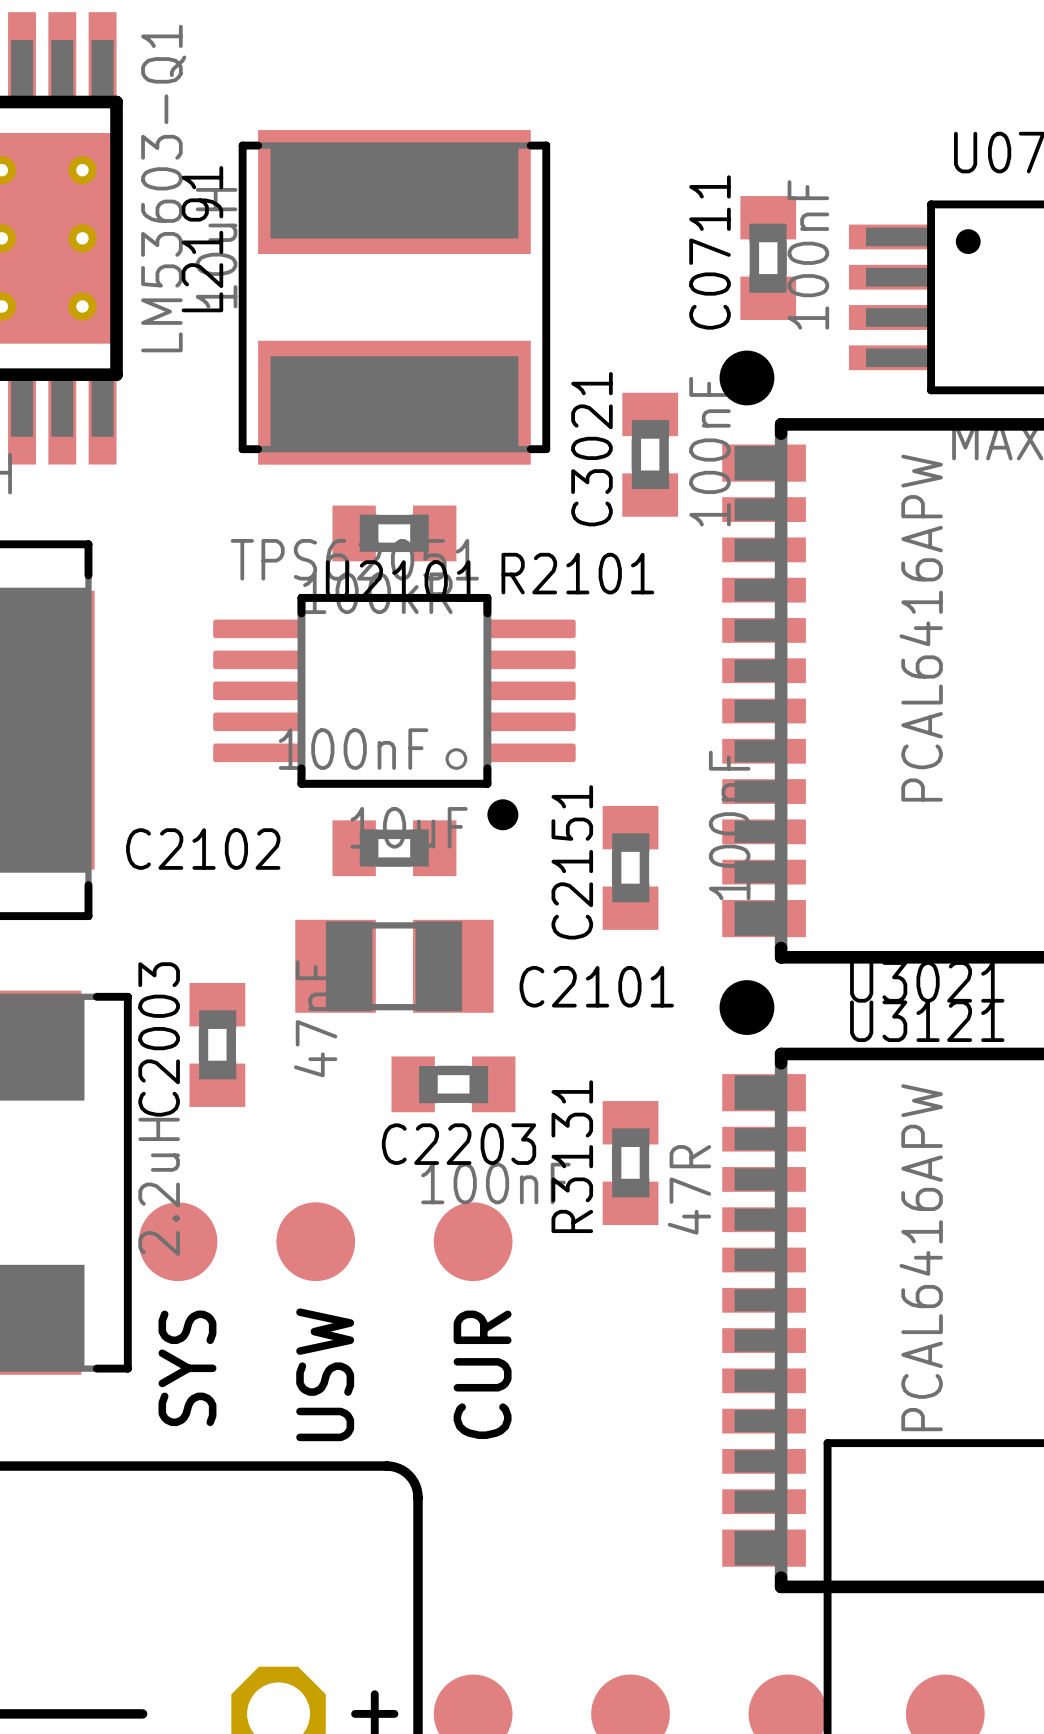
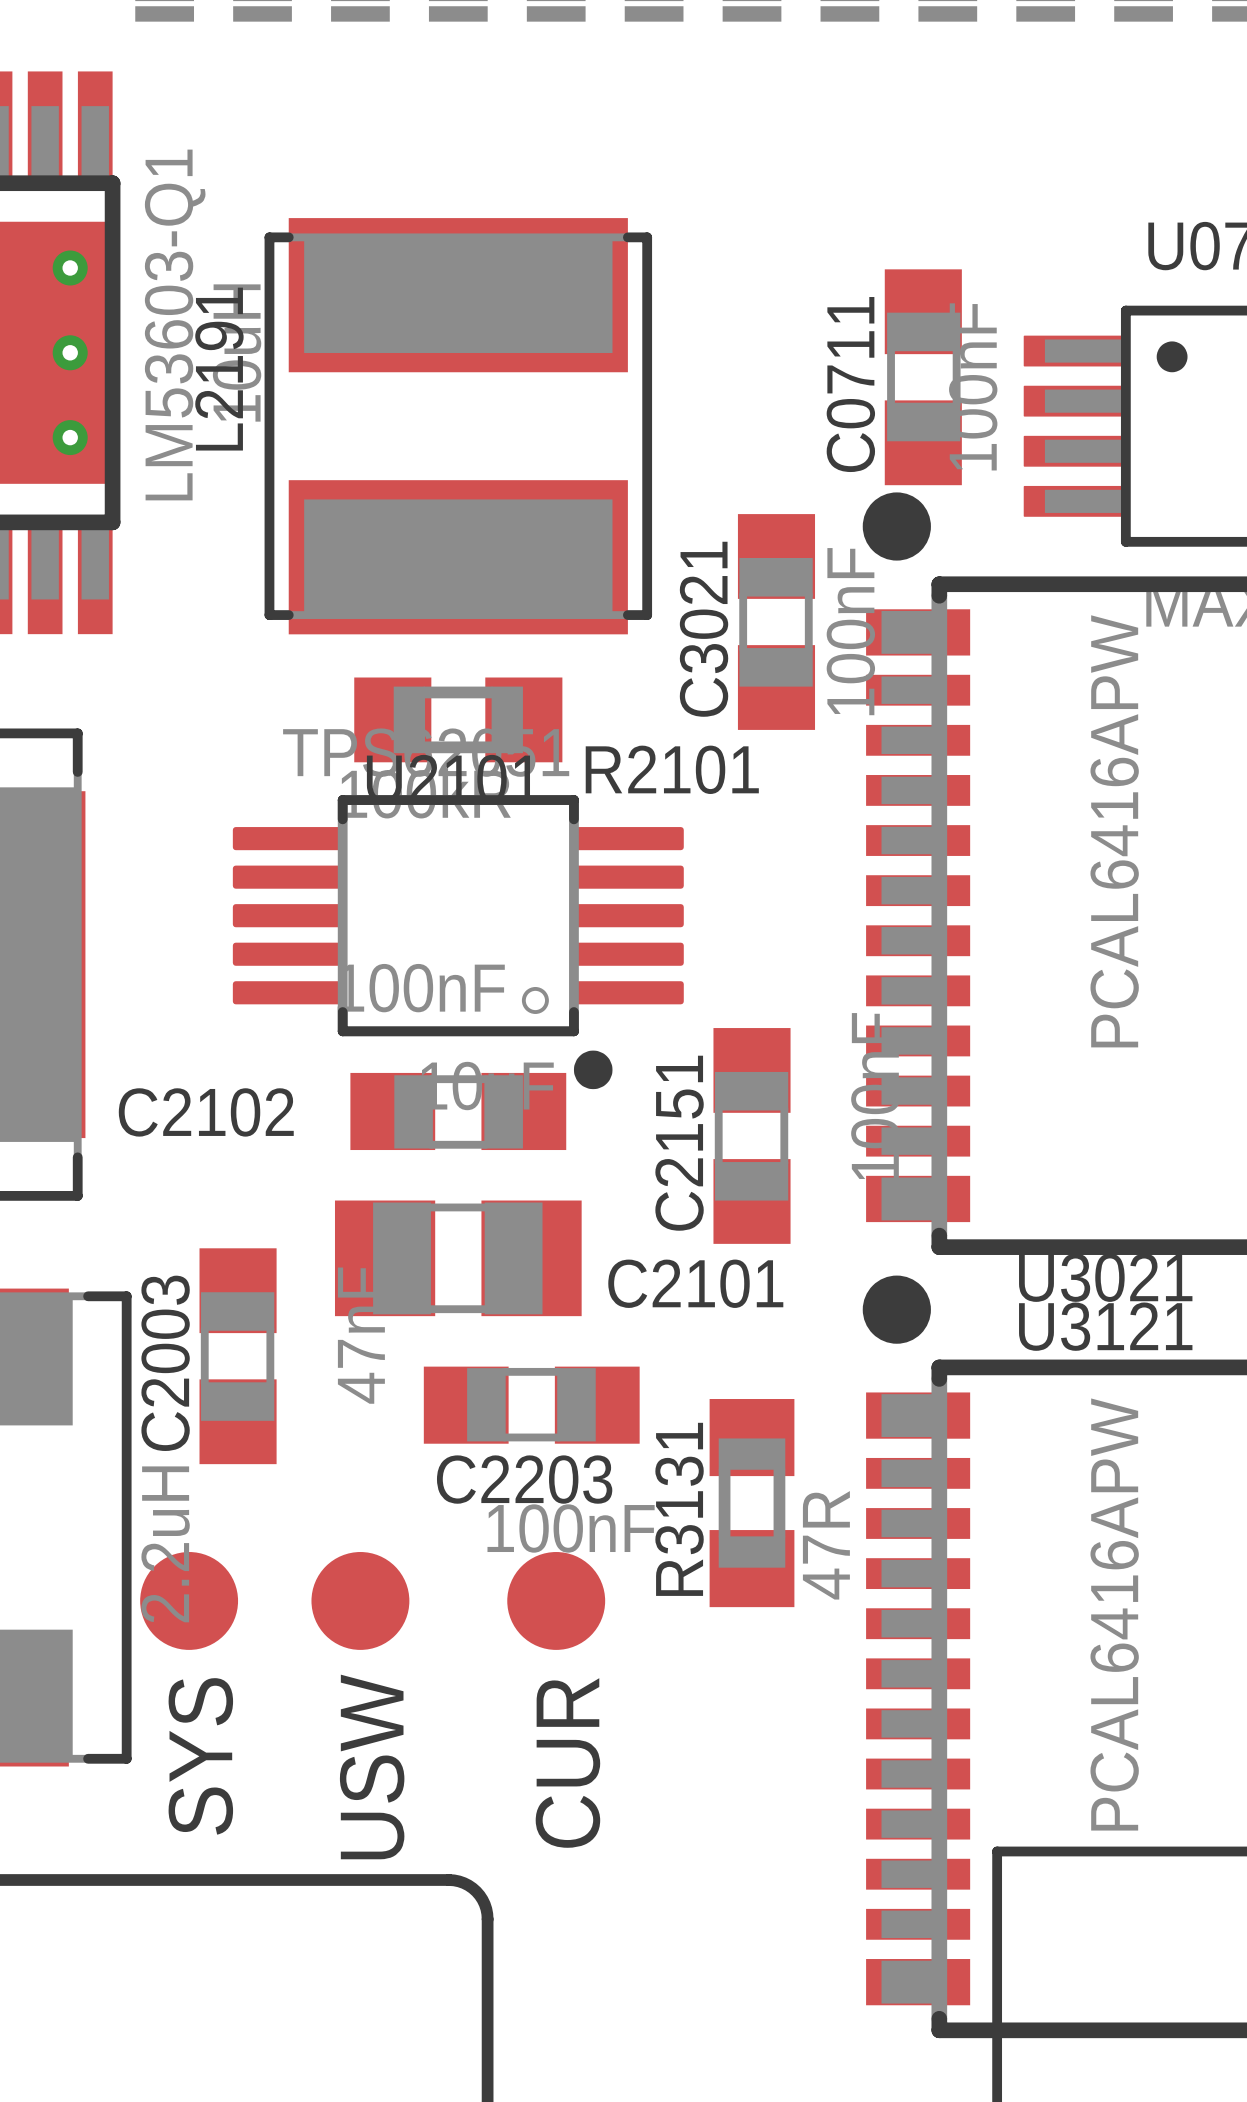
C0711 footprint: [740, 196, 797, 320] -> [884, 269, 962, 486]
C3021 footprint: [622, 392, 679, 517] -> [737, 514, 816, 730]
R2101 footprint: [332, 505, 457, 562] -> [354, 677, 563, 763]
C2151 footprint: [602, 805, 659, 930] -> [713, 1028, 791, 1244]
C2102 footprint: [332, 820, 457, 877] -> [350, 1072, 567, 1151]
C2003 footprint: [189, 983, 246, 1107] -> [199, 1248, 277, 1465]
C2203 footprint: [391, 1056, 516, 1113] -> [423, 1366, 640, 1444]
R3131 footprint: [602, 1101, 659, 1225] -> [709, 1399, 795, 1608]

